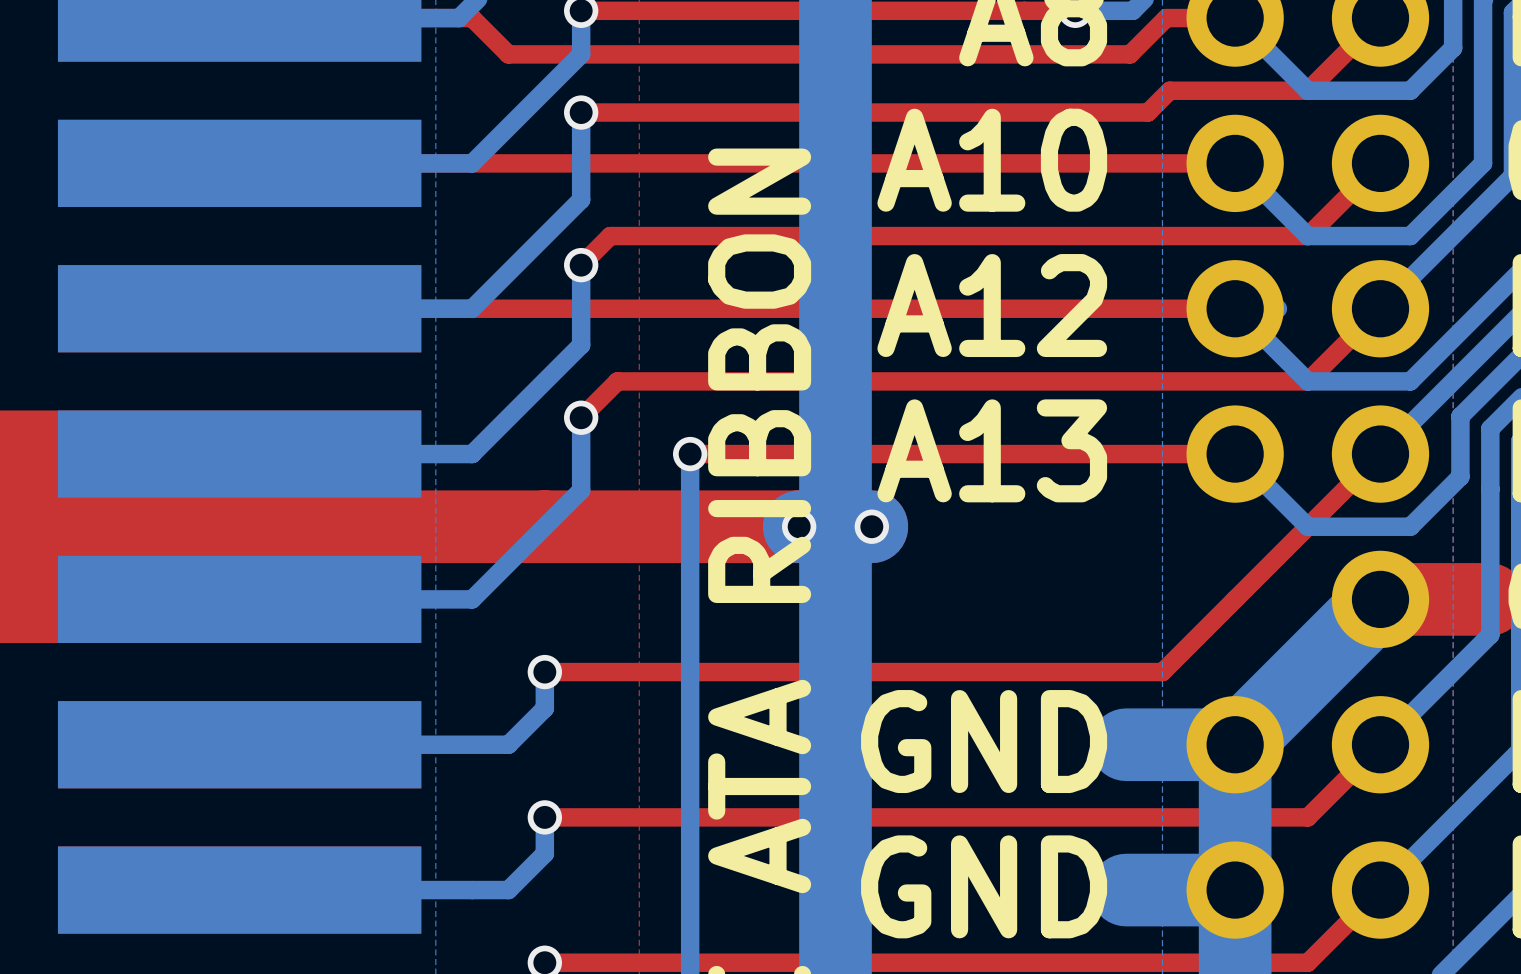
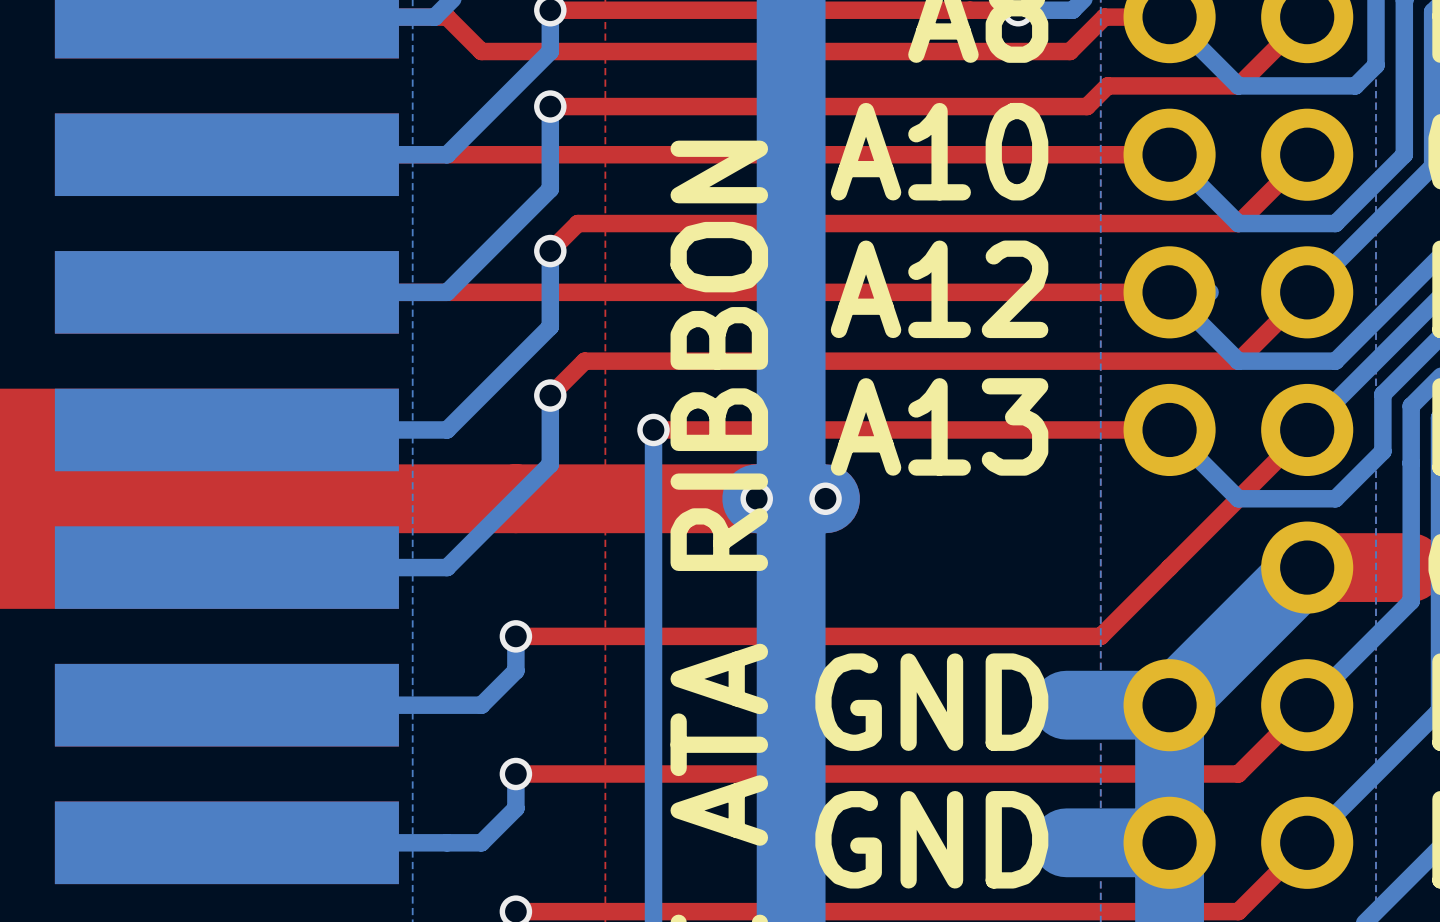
bottom track: (1453, 47) (1410, 90) -> (1376, 45) (1376, 65) (1355, 85) (1335, 85)

